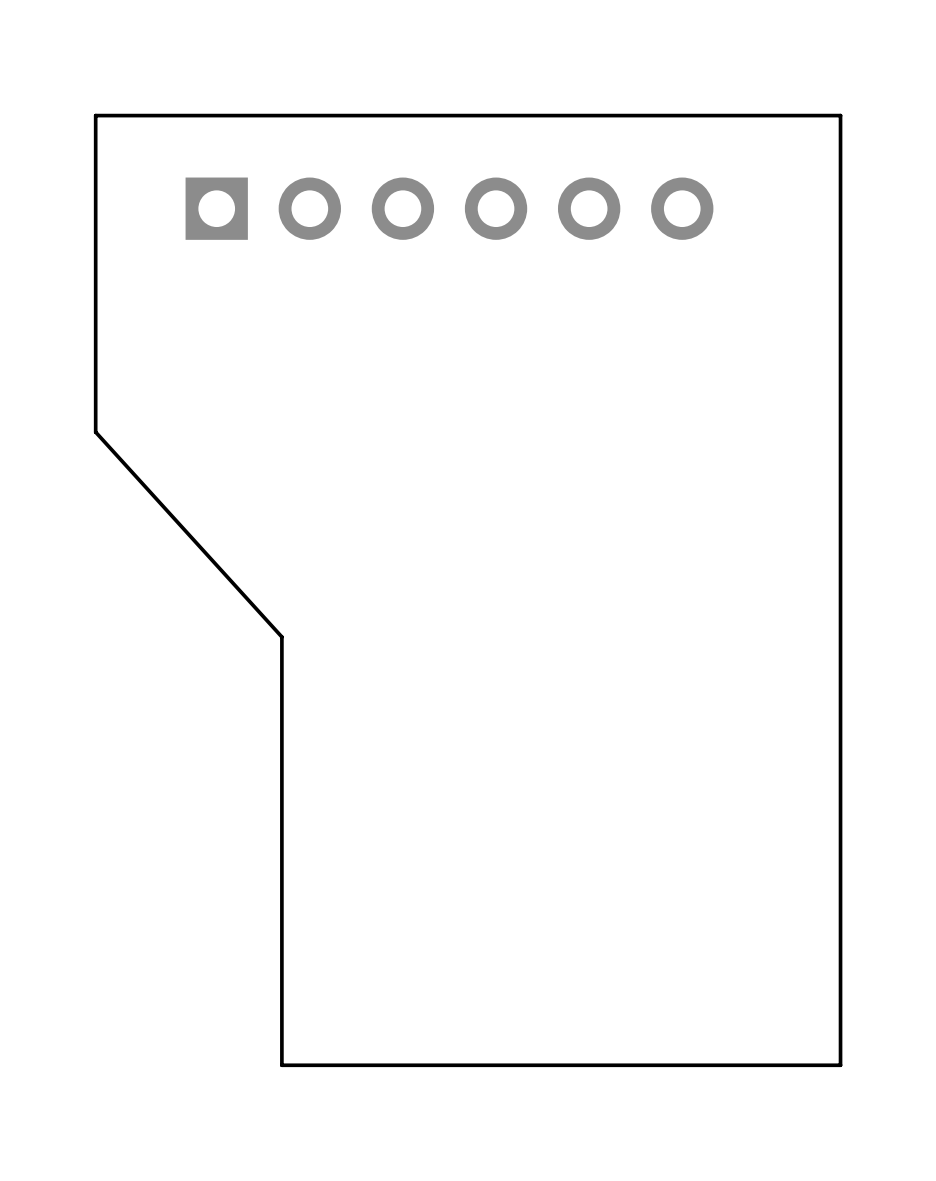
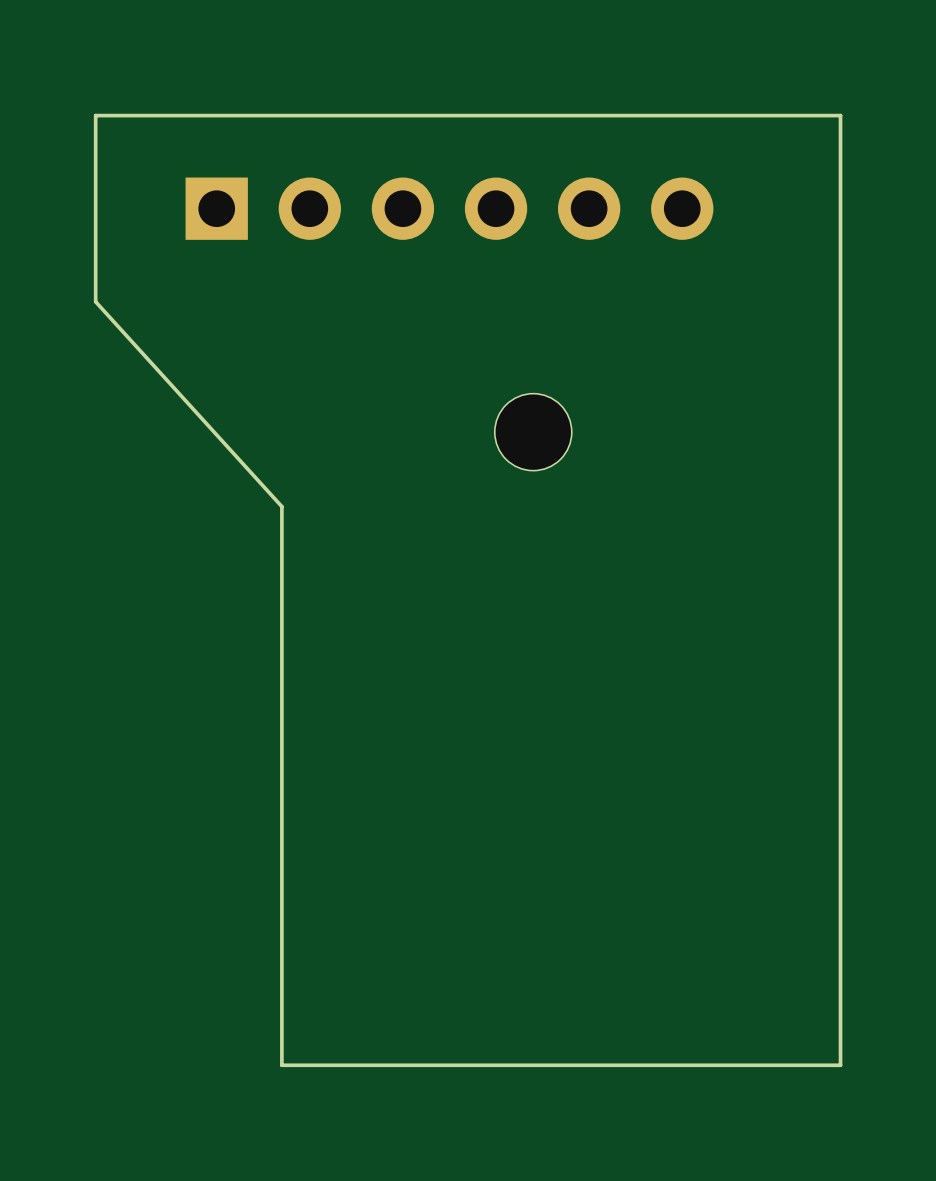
board edge: (95, 301) (95, 432) (281, 636) -> (95, 301) (281, 506) (281, 636)
part: none -> (533, 432)

